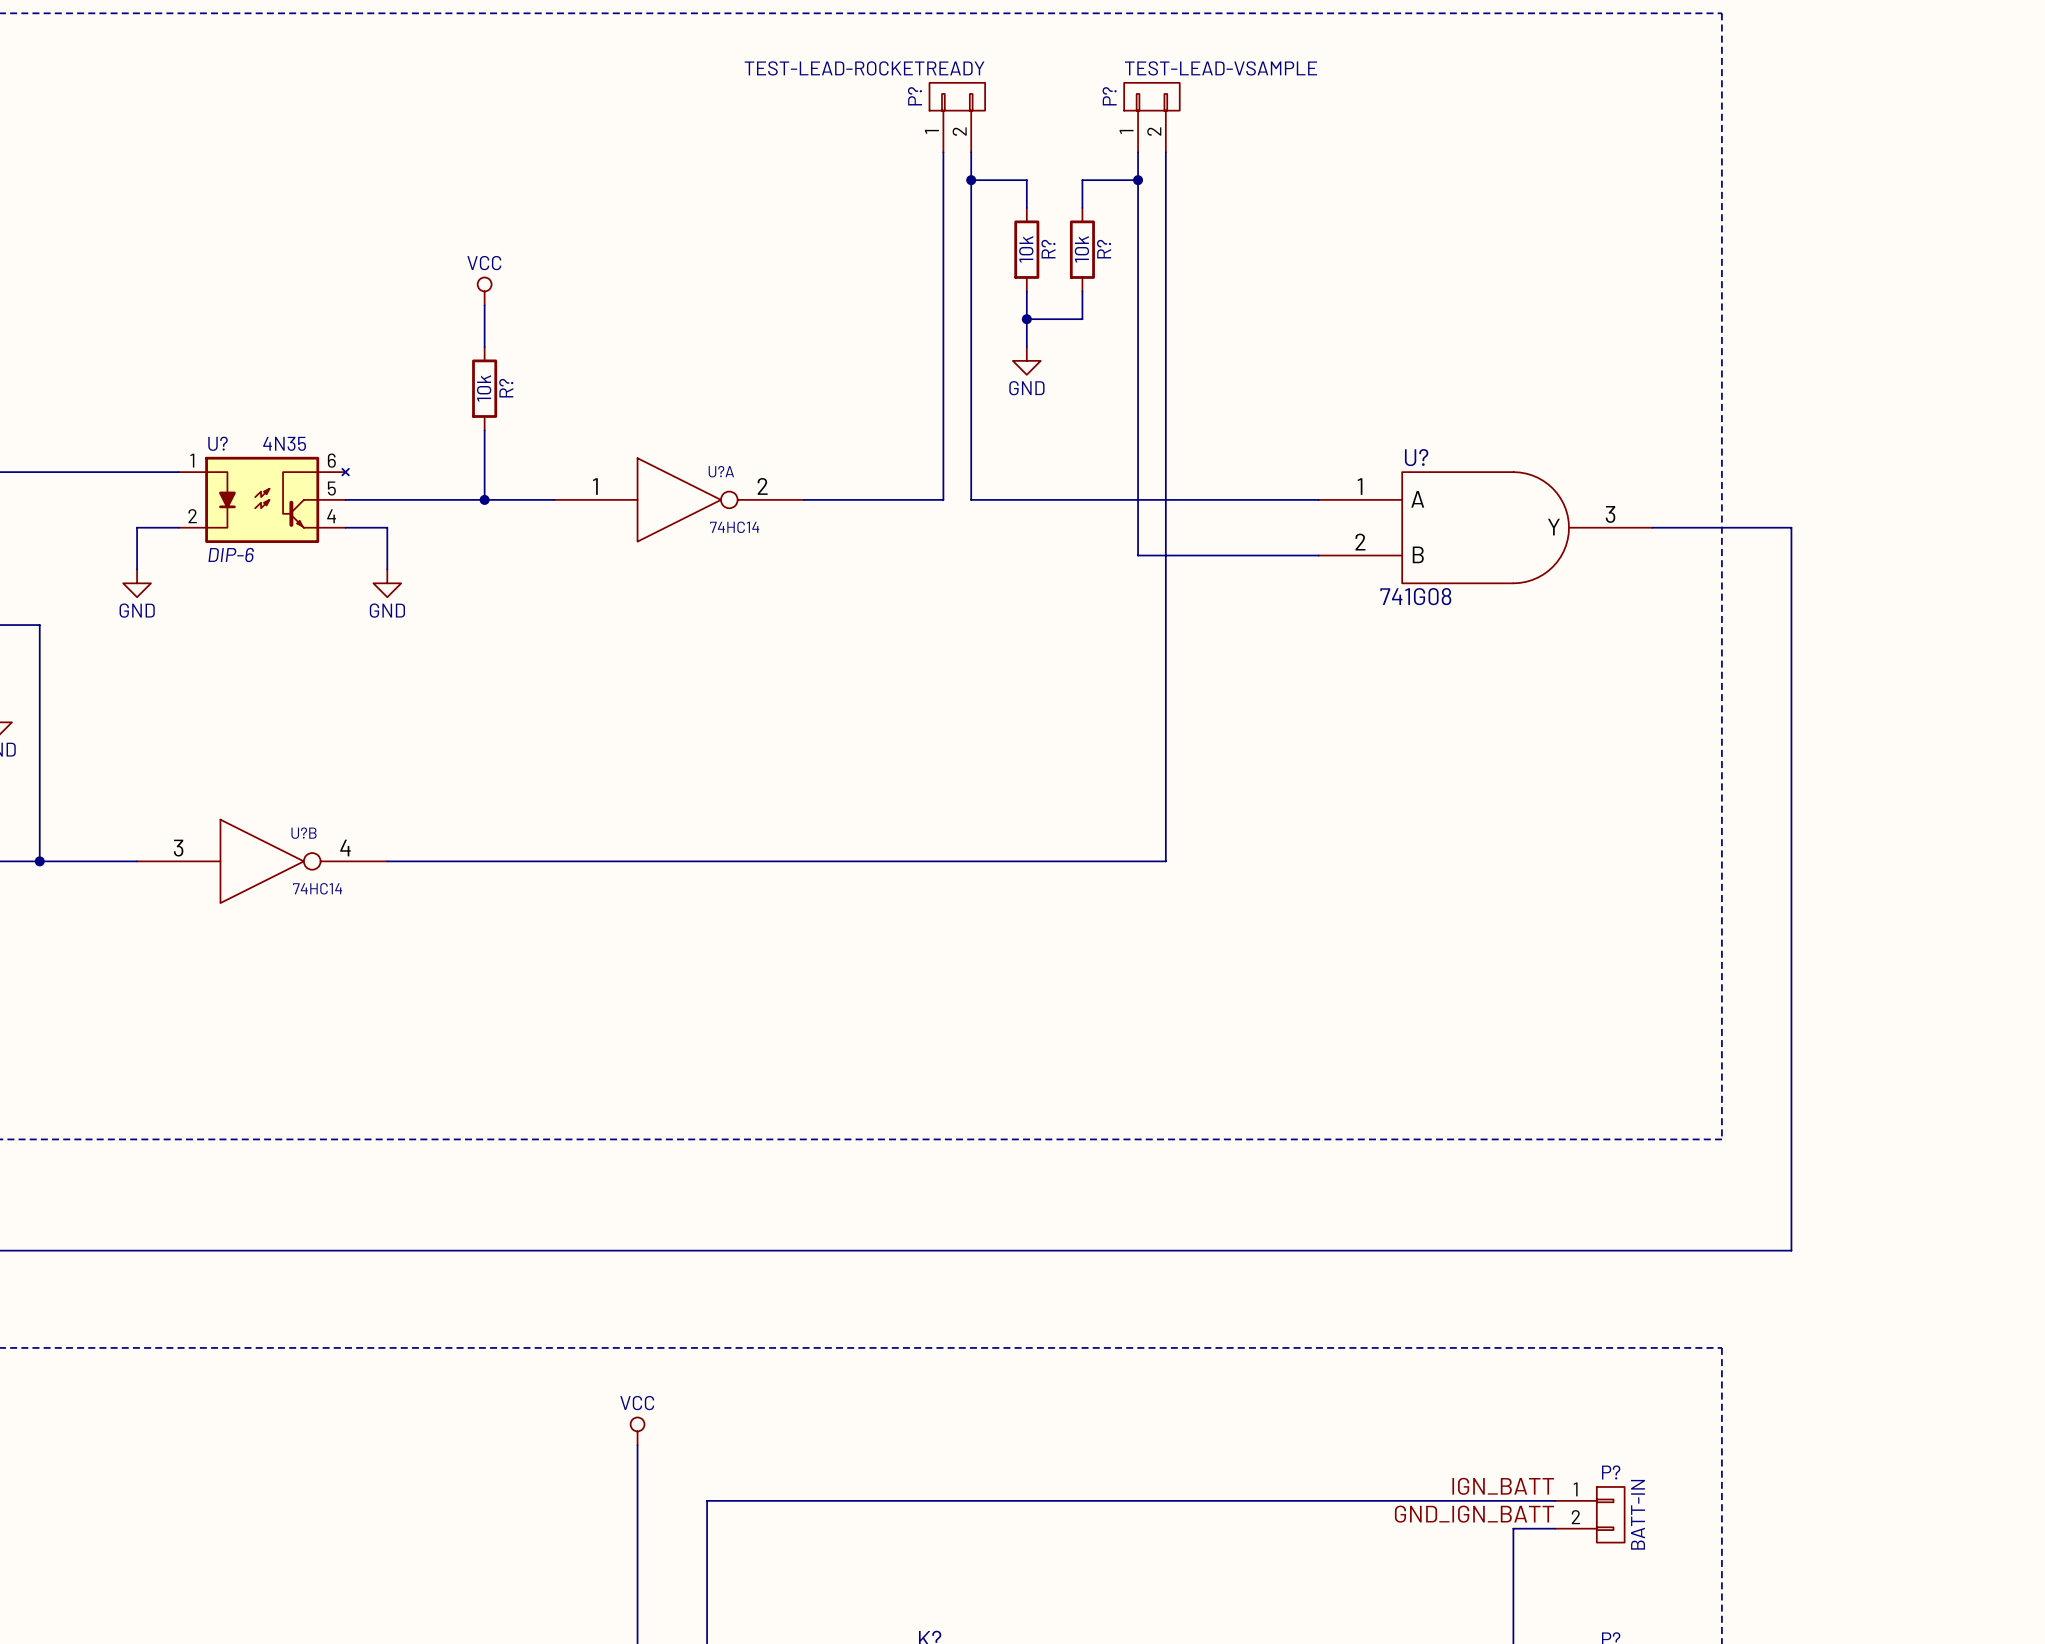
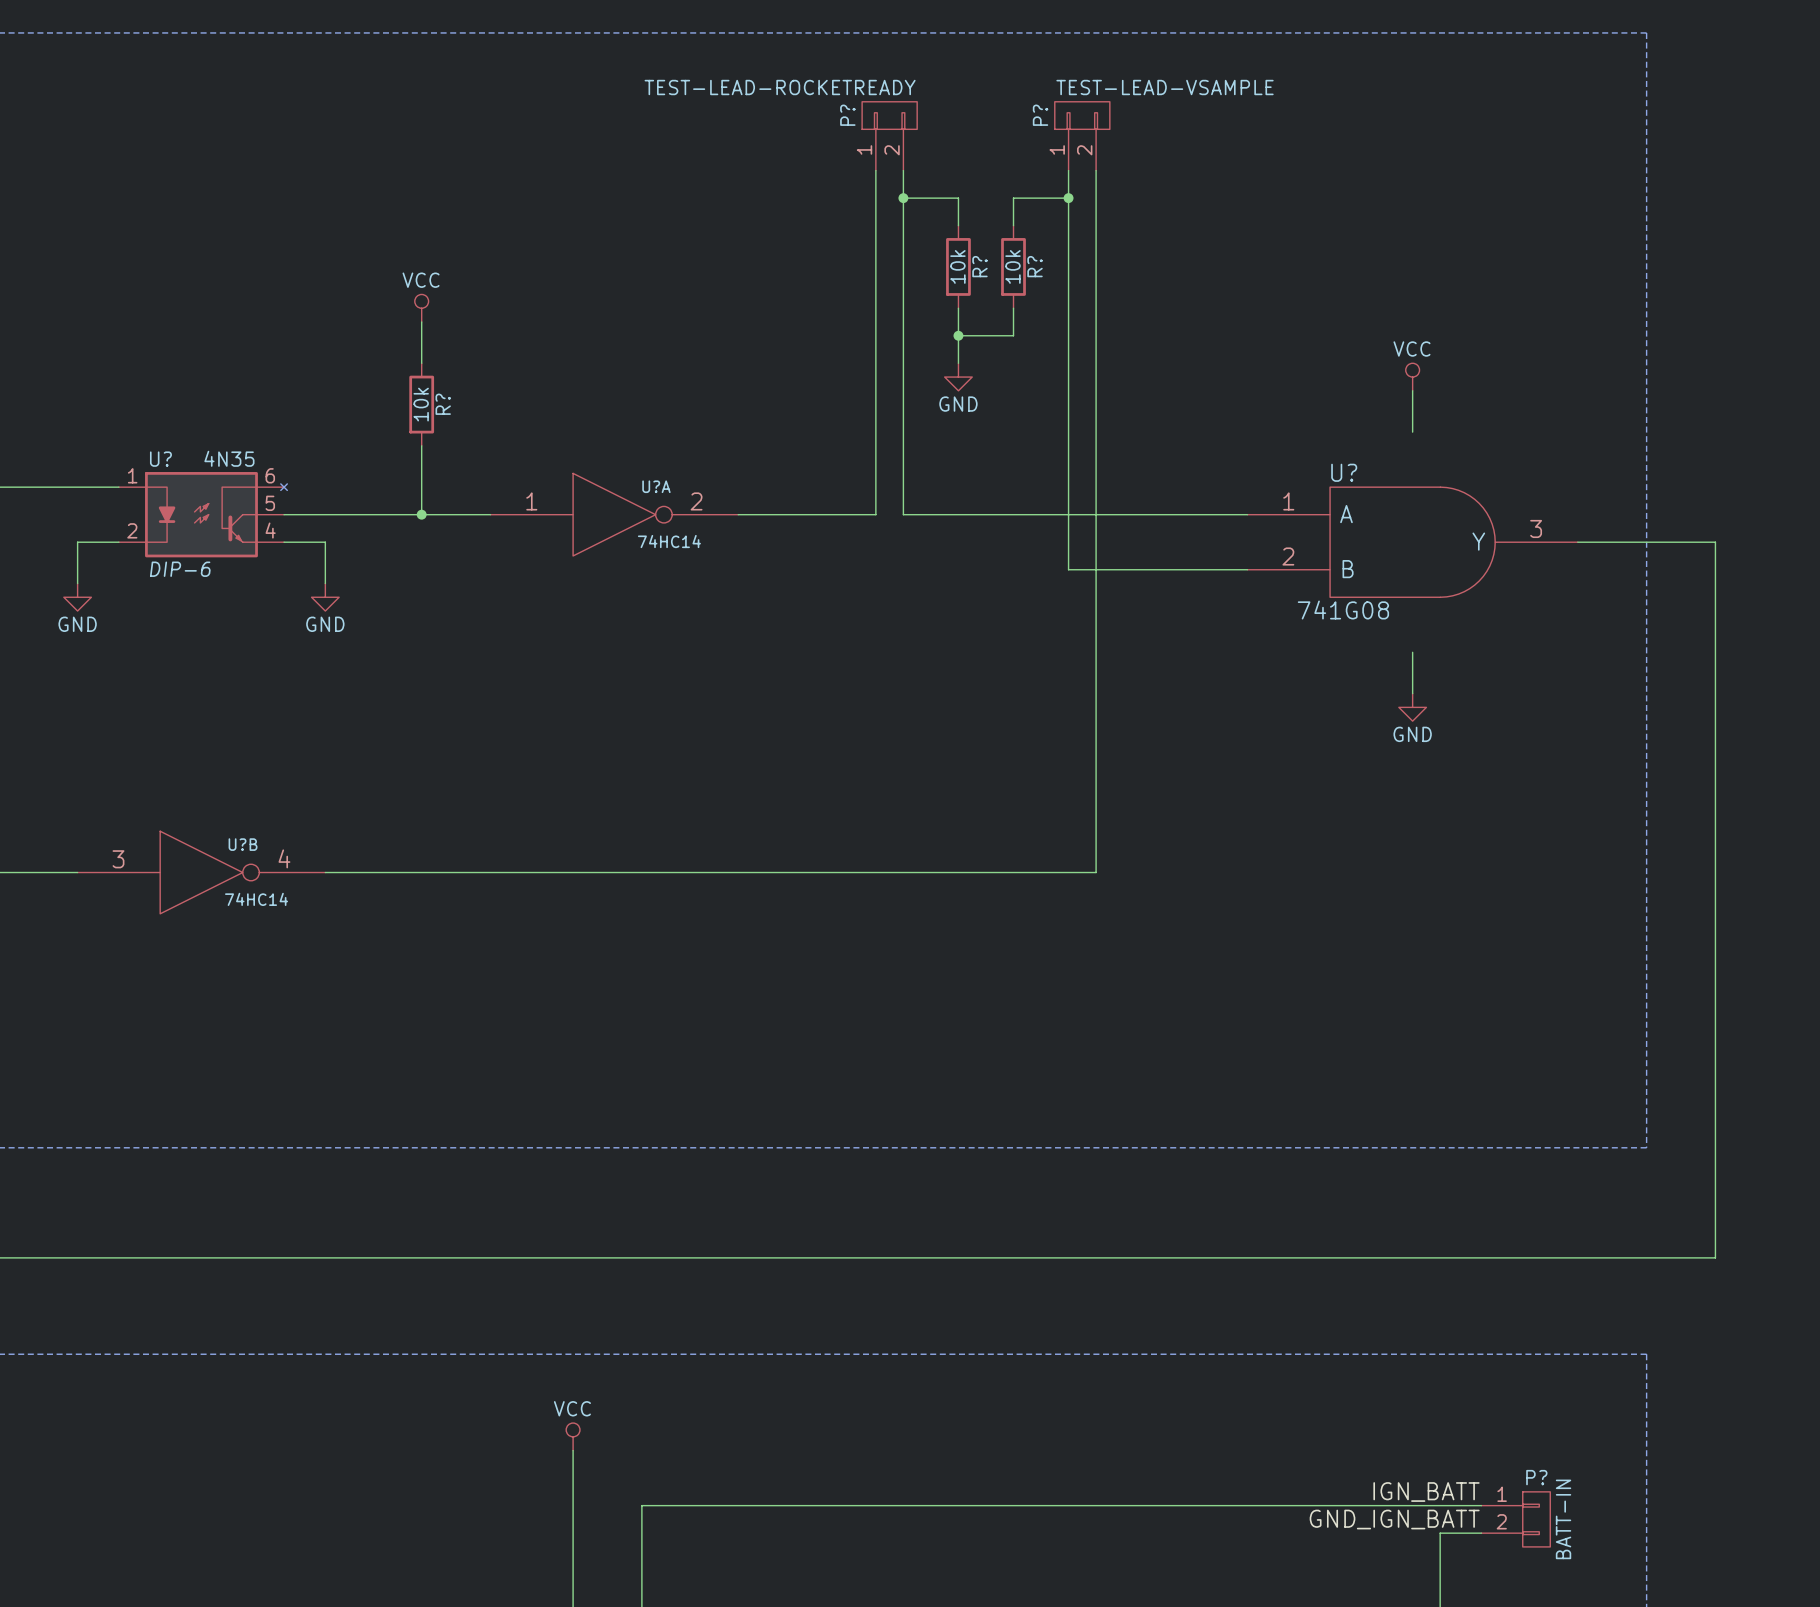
power symbol: none -> VCC (1412, 377)
wire: none -> (1412, 390) (1412, 432)
wire: none -> (1412, 652) (1412, 693)
power symbol: none -> GND (1412, 707)

